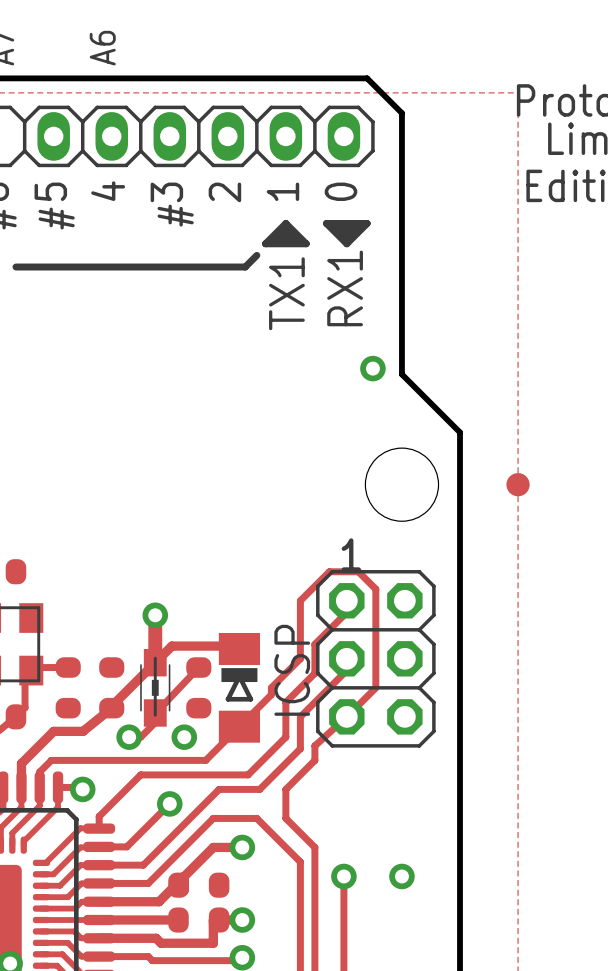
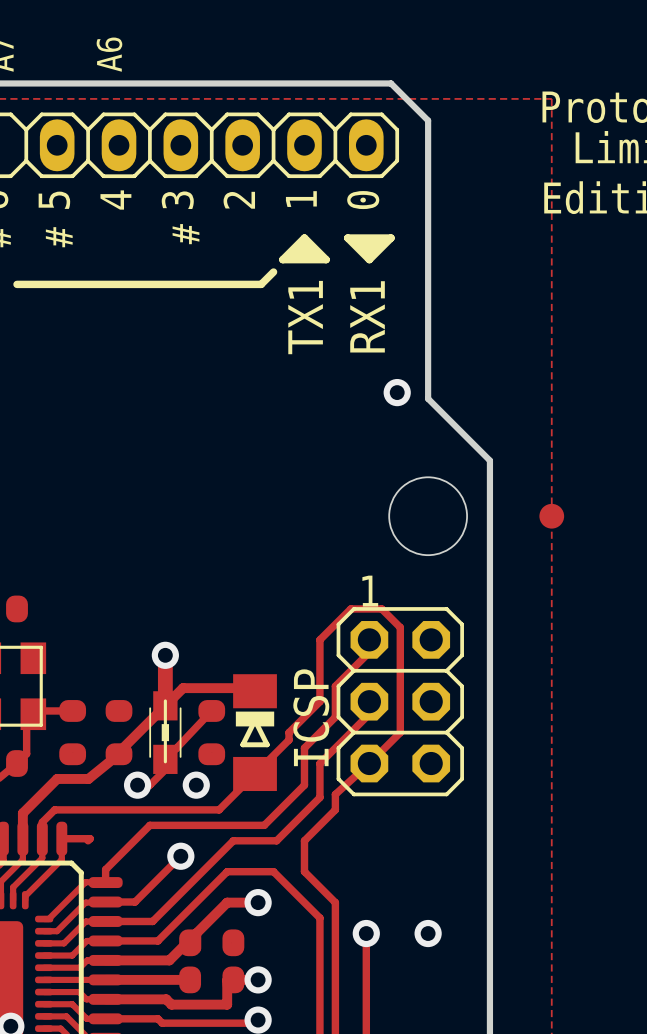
via: (82, 789) -> none

